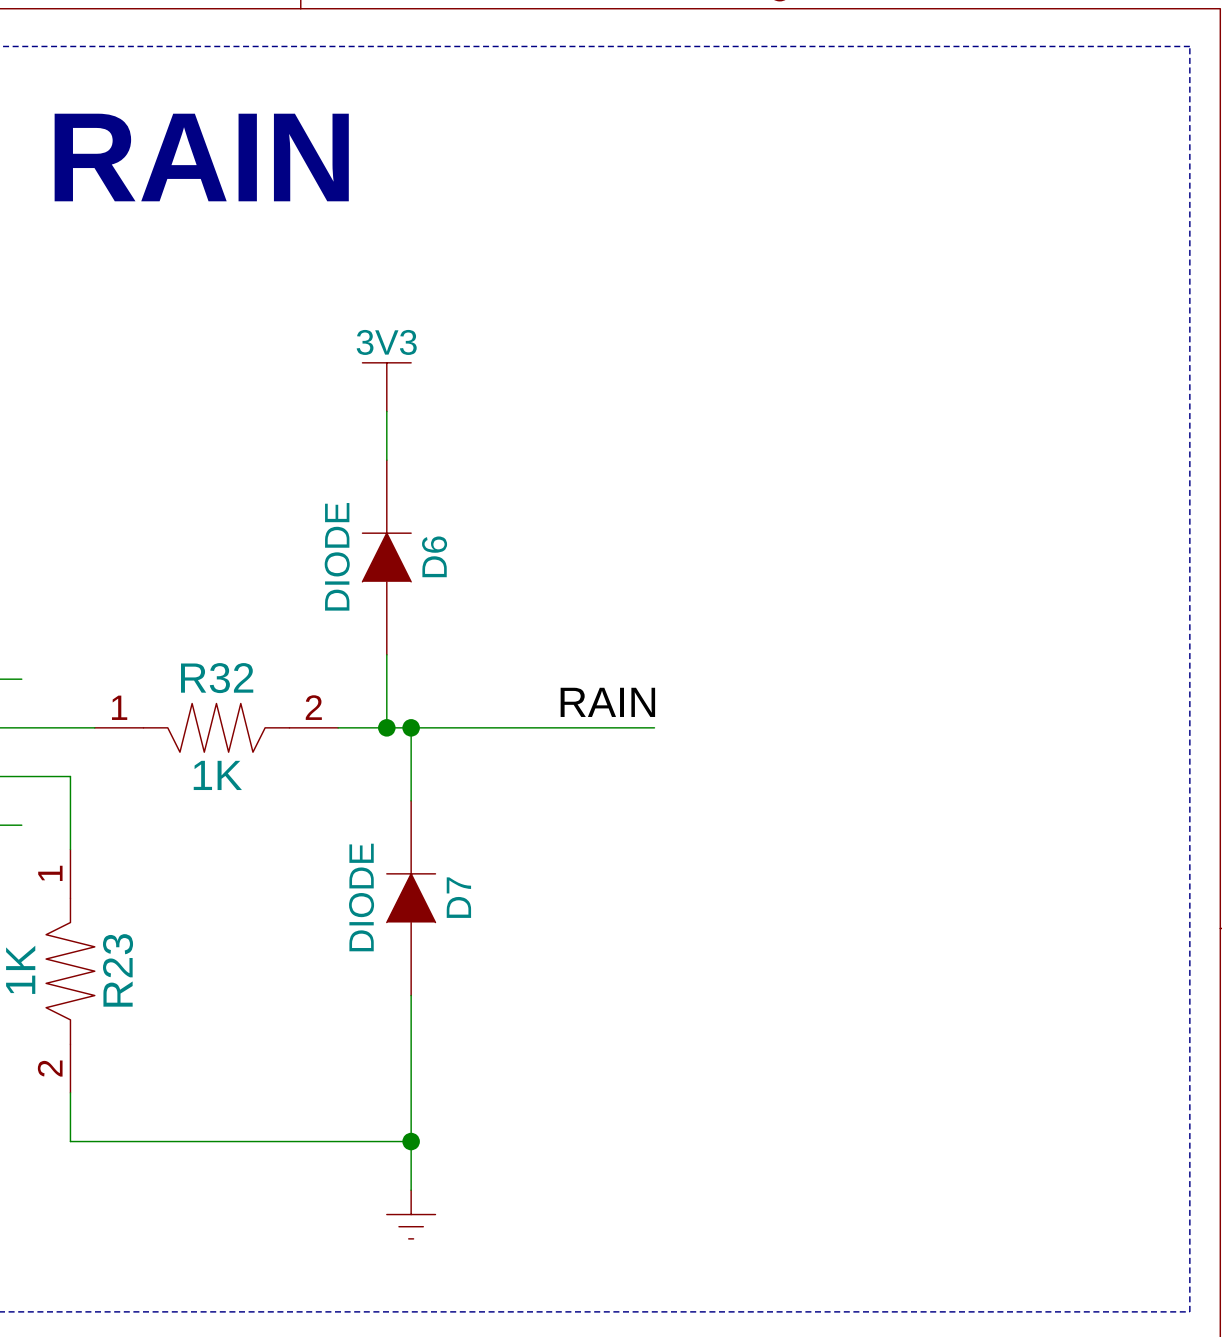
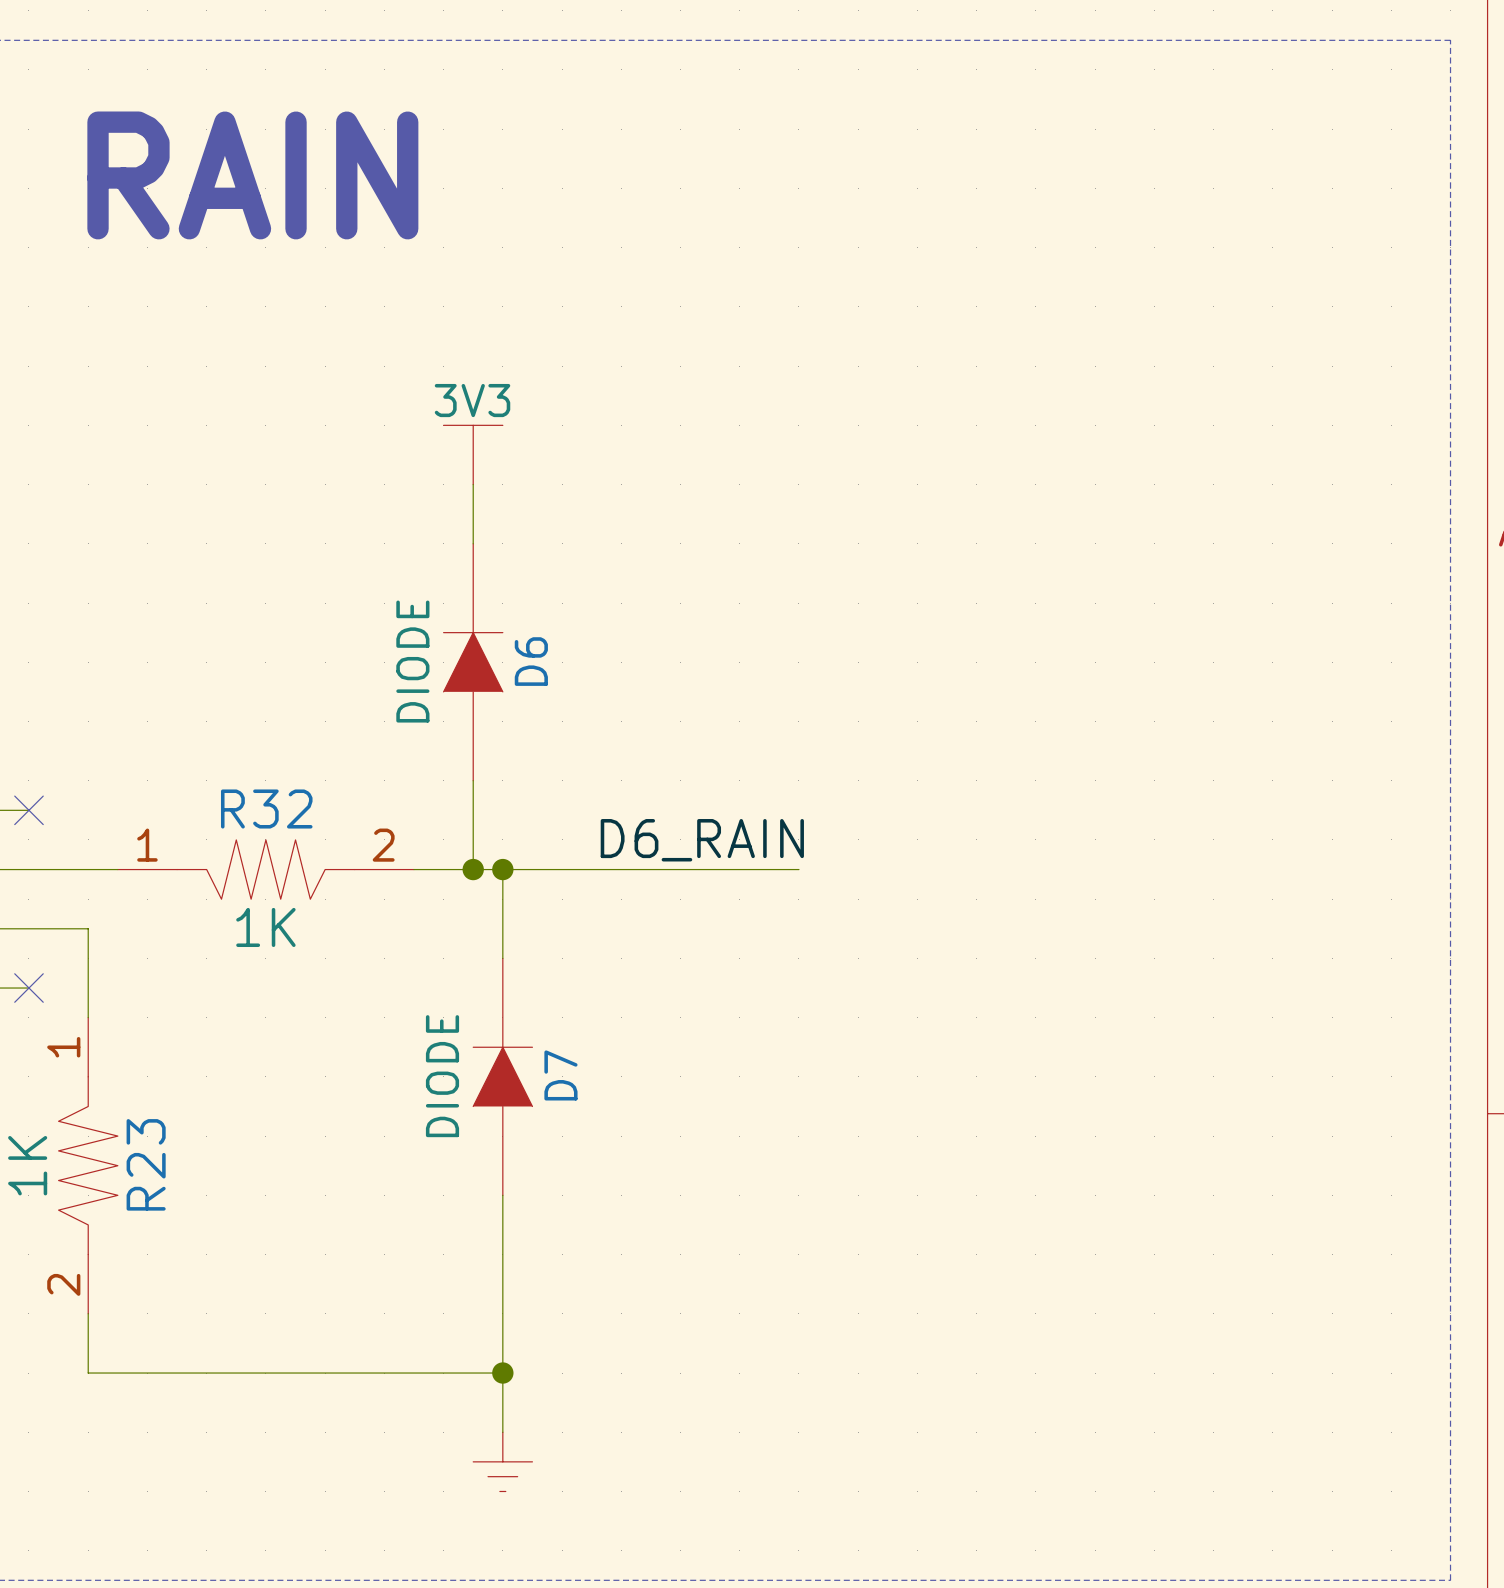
no-connect mark: none -> (28, 810)
label: RAIN (607, 702) -> D6_RAIN (702, 840)
no-connect mark: none -> (28, 988)

